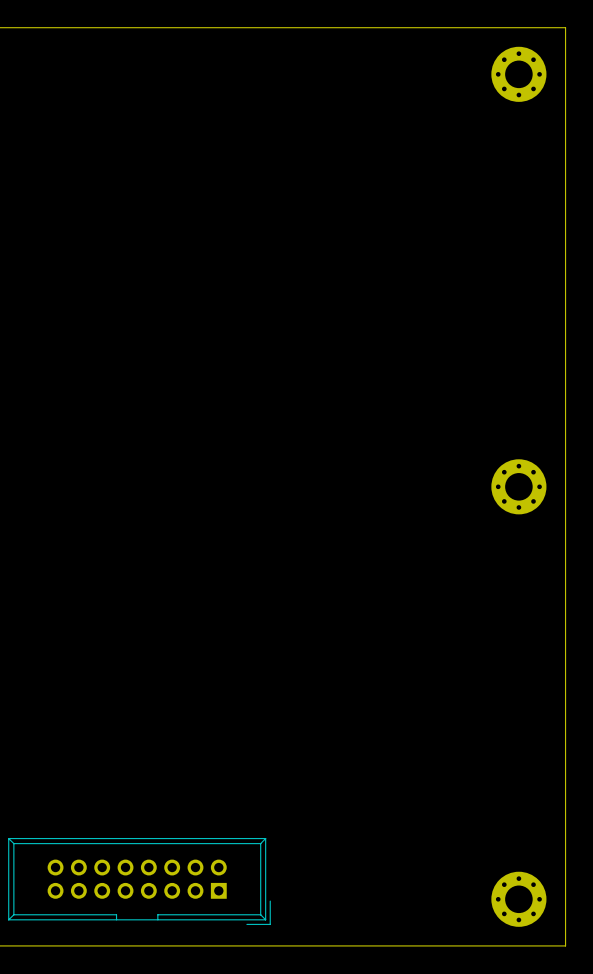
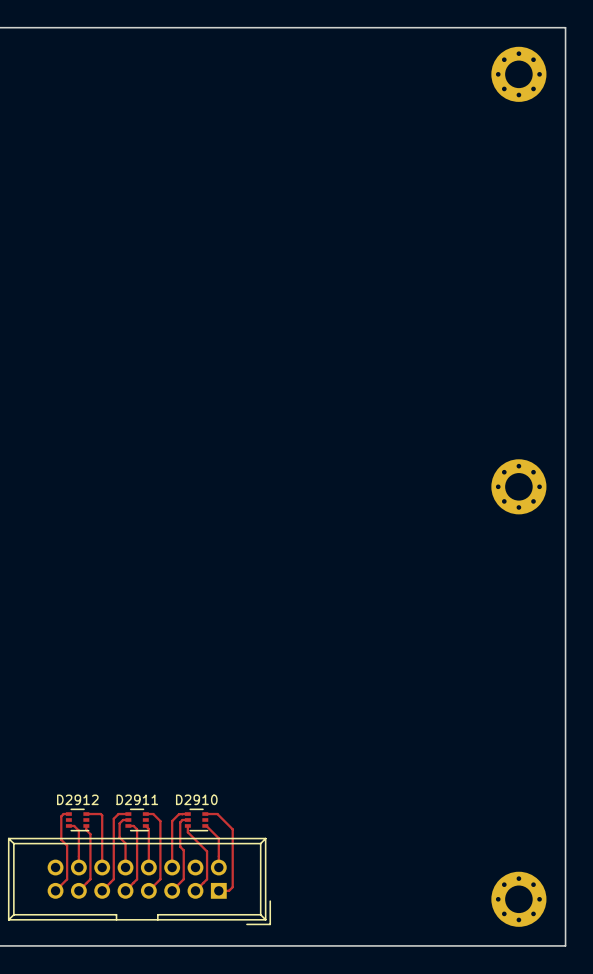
track: none -> (68, 814) (63, 814) (61, 816) (61, 839) (67, 845) (67, 879) (55, 890)
track: none -> (86, 814) (102, 815) (102, 867)
track: none -> (128, 814) (118, 814) (113, 818) (113, 879) (102, 890)
track: none -> (145, 814) (153, 814) (160, 821) (160, 879) (148, 890)
track: none -> (187, 814) (179, 814) (172, 821) (172, 867)
track: none -> (205, 814) (217, 814) (232, 829) (232, 887) (229, 890) (218, 890)
D2912: none -> (77, 819)
track: none -> (128, 819) (123, 819) (119, 823) (119, 837) (125, 843) (125, 867)
D2911: none -> (137, 819)
track: none -> (187, 819) (182, 819) (180, 822) (180, 846) (183, 850) (183, 879) (172, 890)
D2910: none -> (196, 819)
track: none -> (68, 825) (74, 825) (78, 830) (78, 867)
track: none -> (86, 825) (86, 830) (90, 834) (90, 879) (78, 890)
track: none -> (128, 825) (133, 825) (137, 829) (137, 879) (125, 890)
track: none -> (145, 825) (148, 828) (148, 867)
track: none -> (187, 825) (187, 832) (207, 851) (207, 879) (195, 890)
track: none -> (205, 825) (218, 838) (218, 867)

